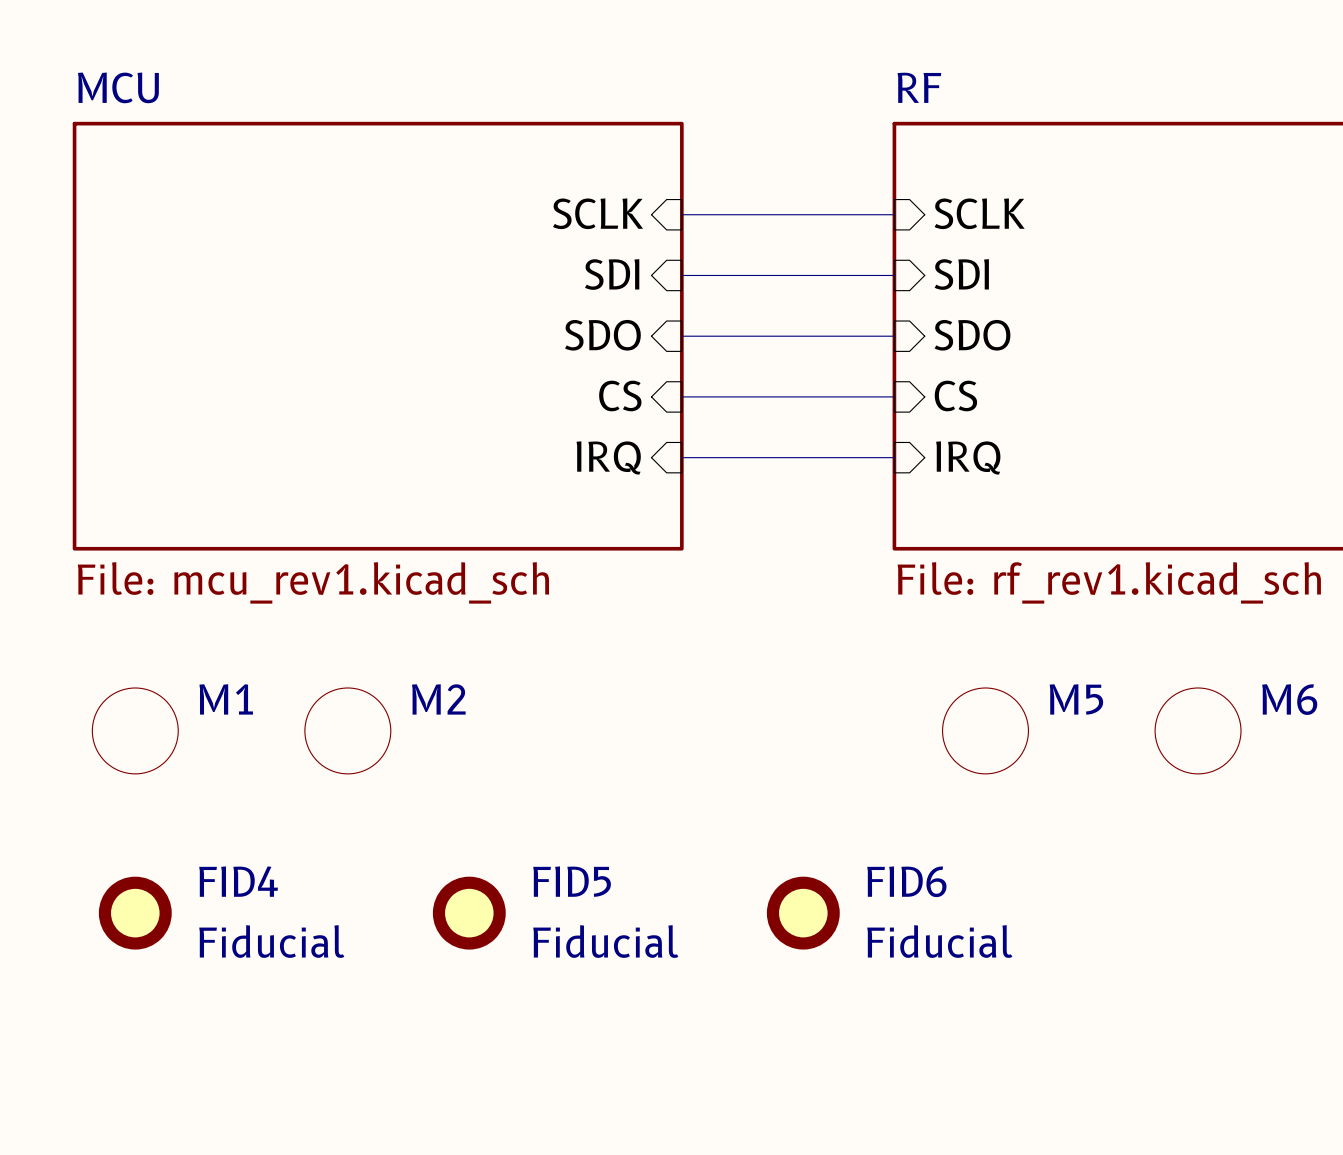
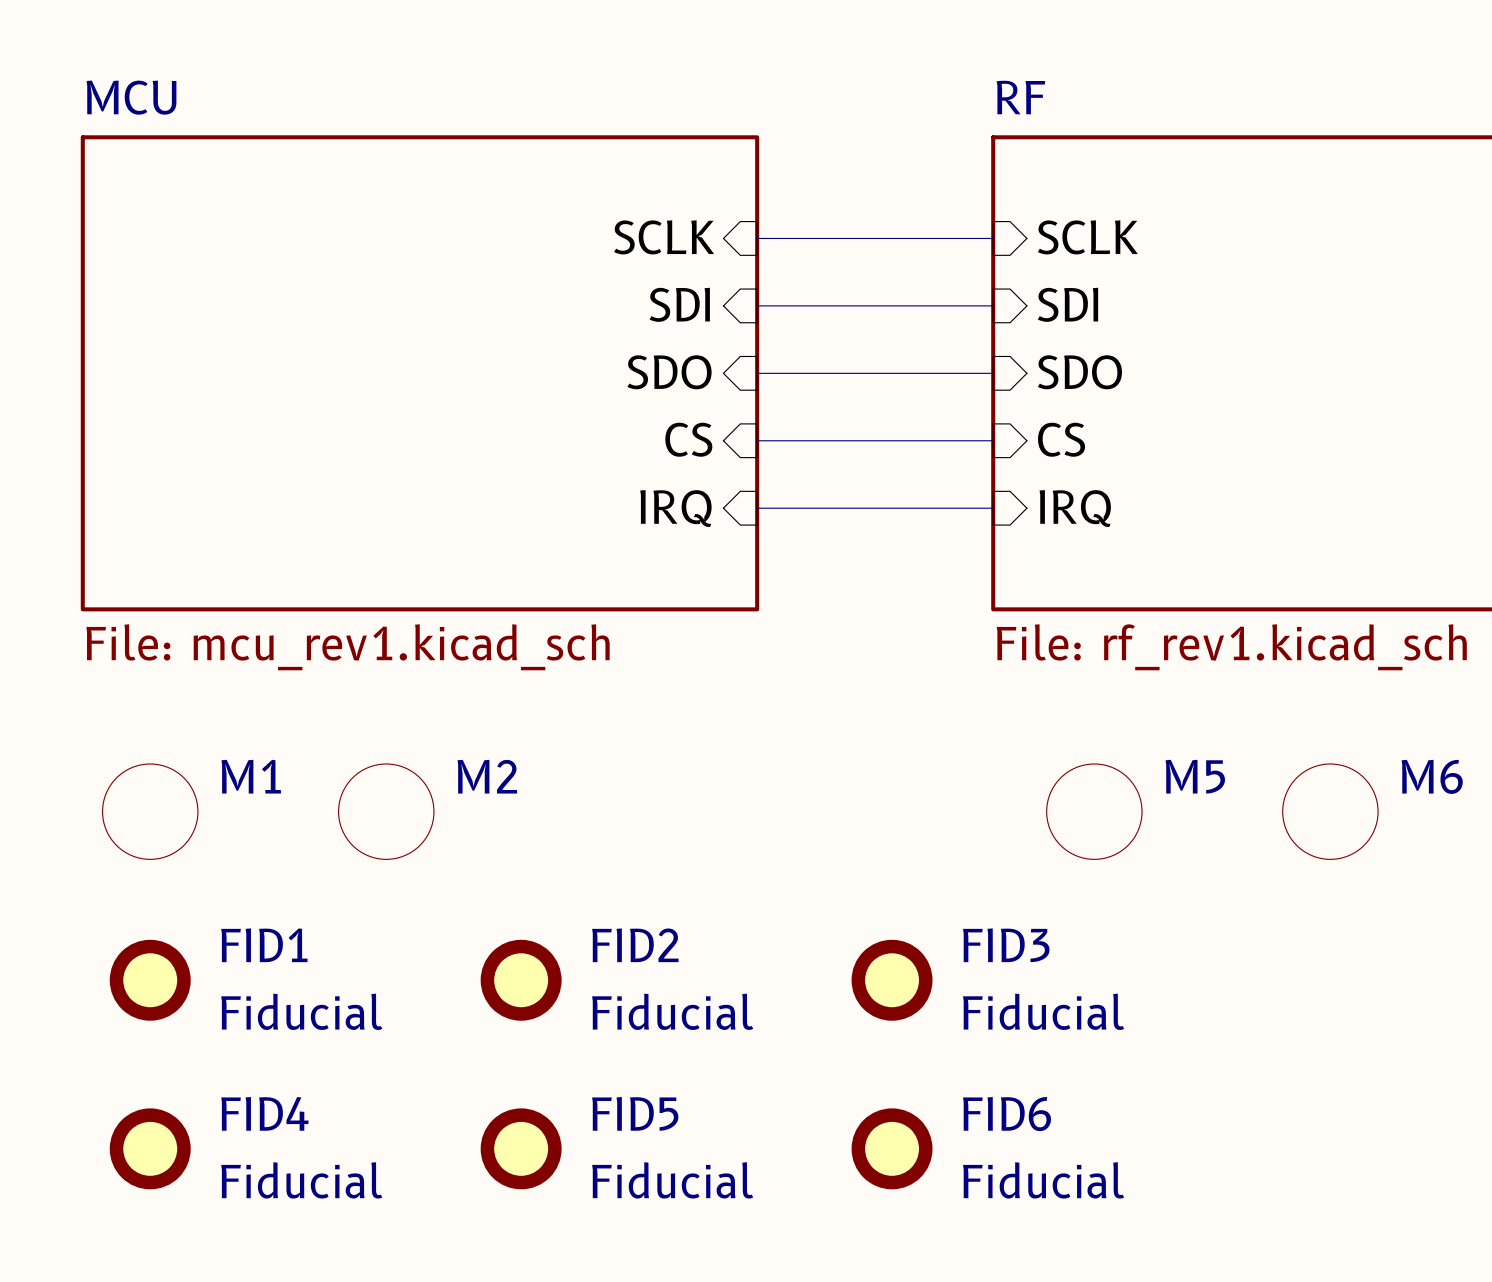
FID1: none -> Fiducial (150, 980)
FID2: none -> Fiducial (521, 980)
FID3: none -> Fiducial (892, 980)
FID4 position: (135, 913) -> (150, 1148)
FID5 position: (469, 913) -> (521, 1148)
FID6 position: (803, 913) -> (892, 1148)

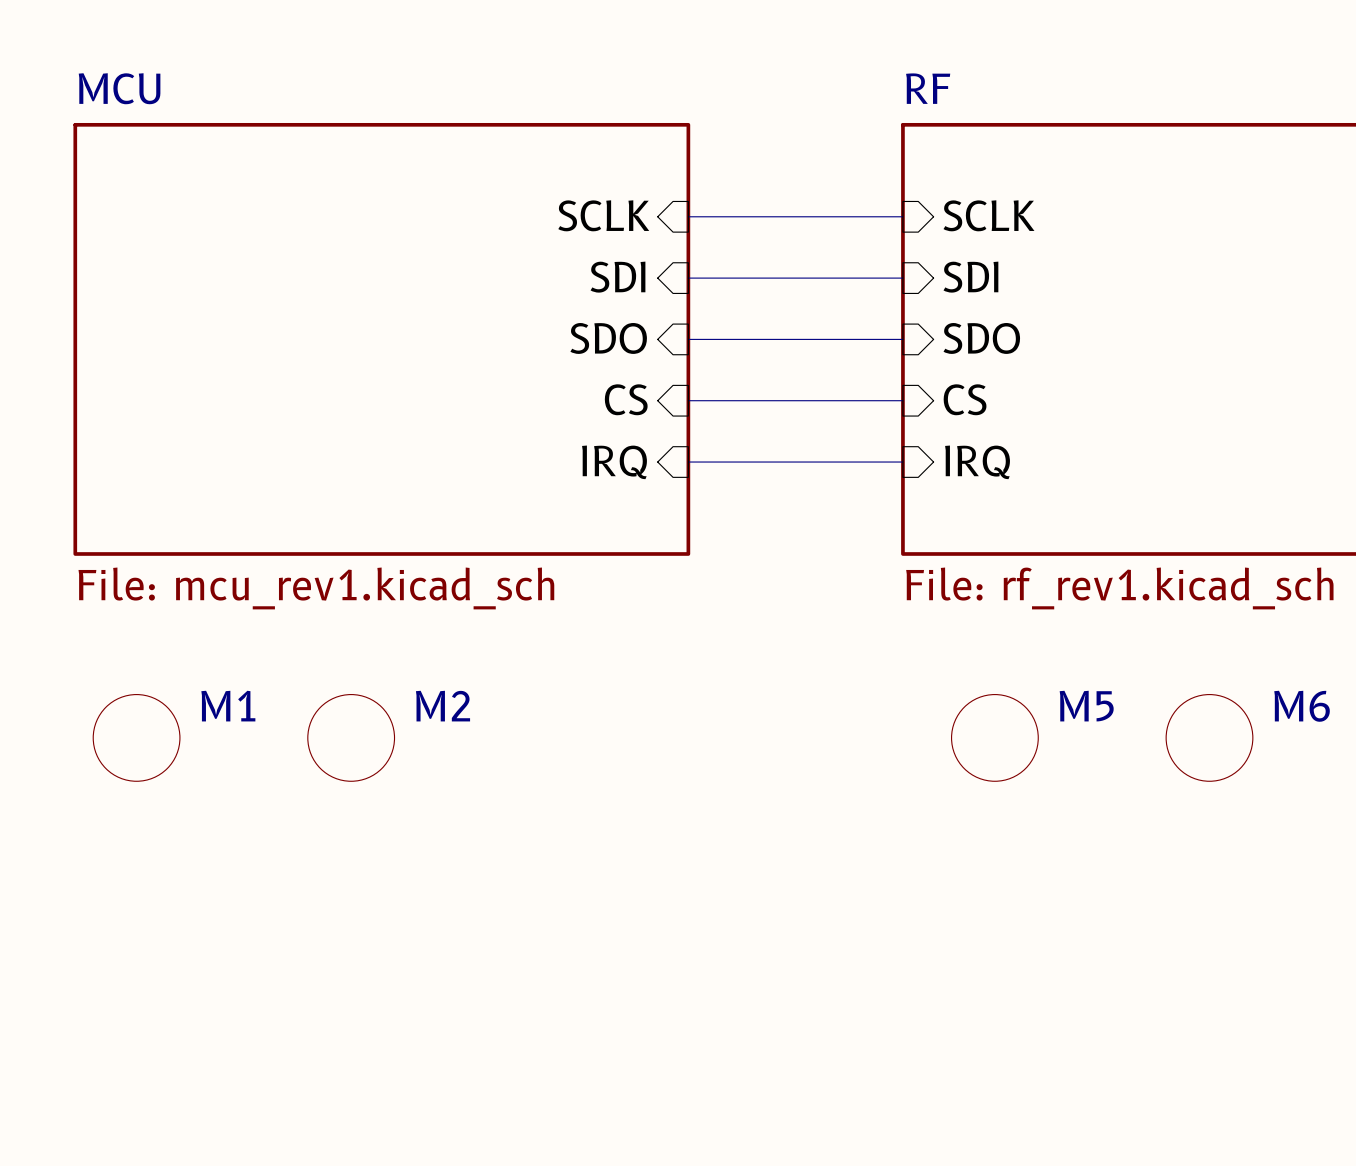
FID1: Fiducial (150, 980) -> none
FID2: Fiducial (521, 980) -> none
FID3: Fiducial (892, 980) -> none
FID4: Fiducial (150, 1148) -> none
FID5: Fiducial (521, 1148) -> none
FID6: Fiducial (892, 1148) -> none

